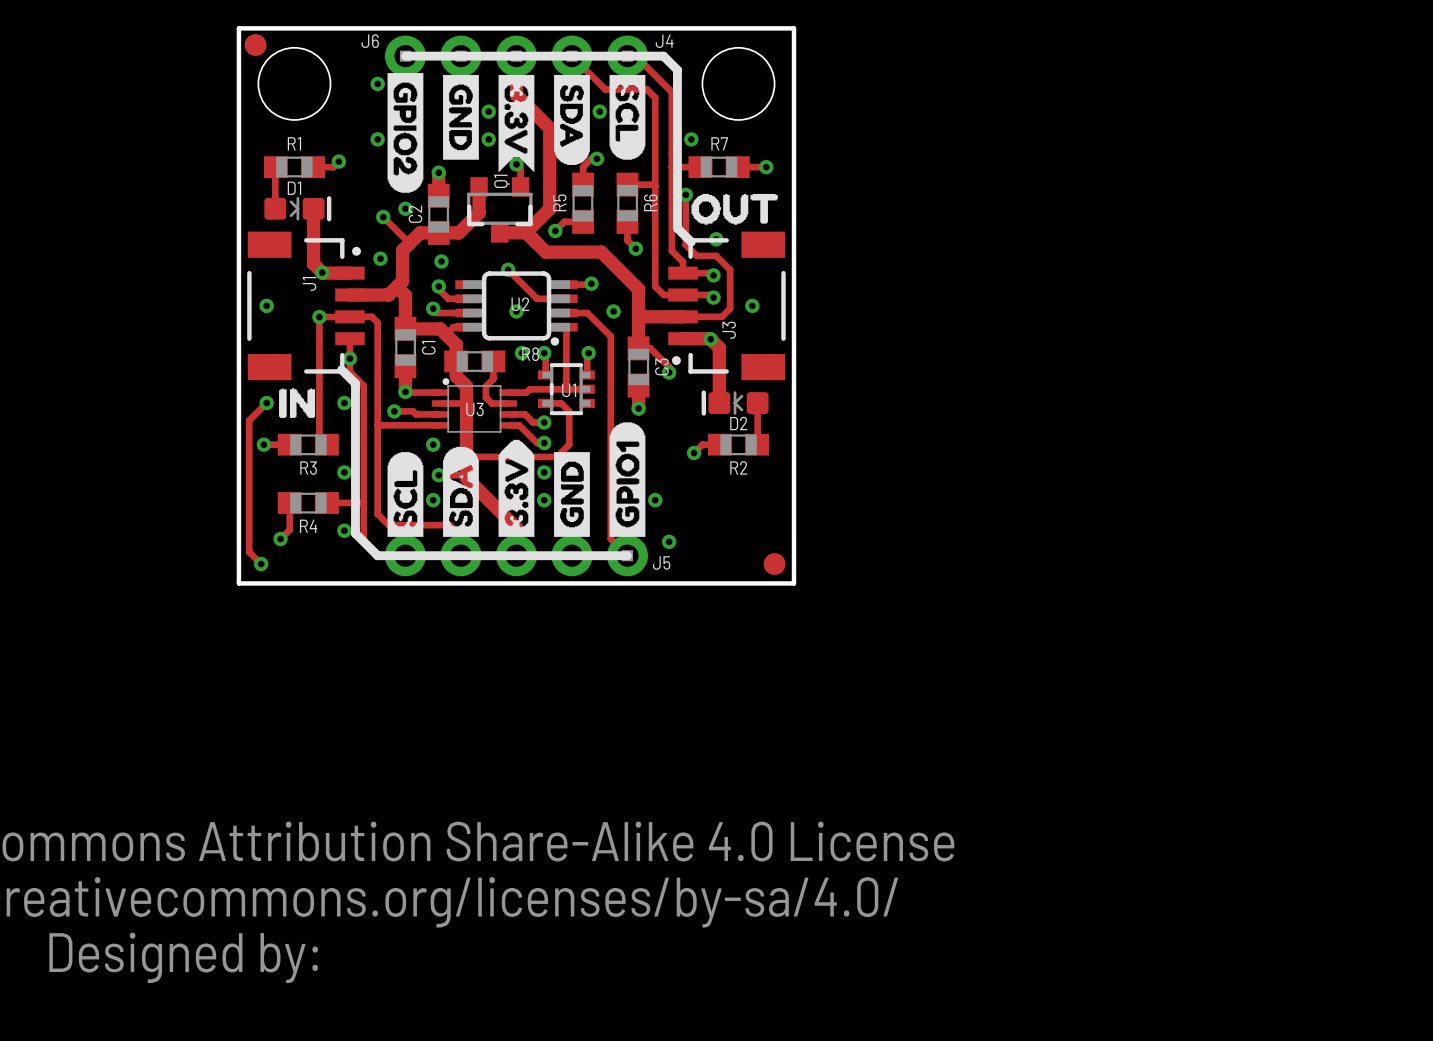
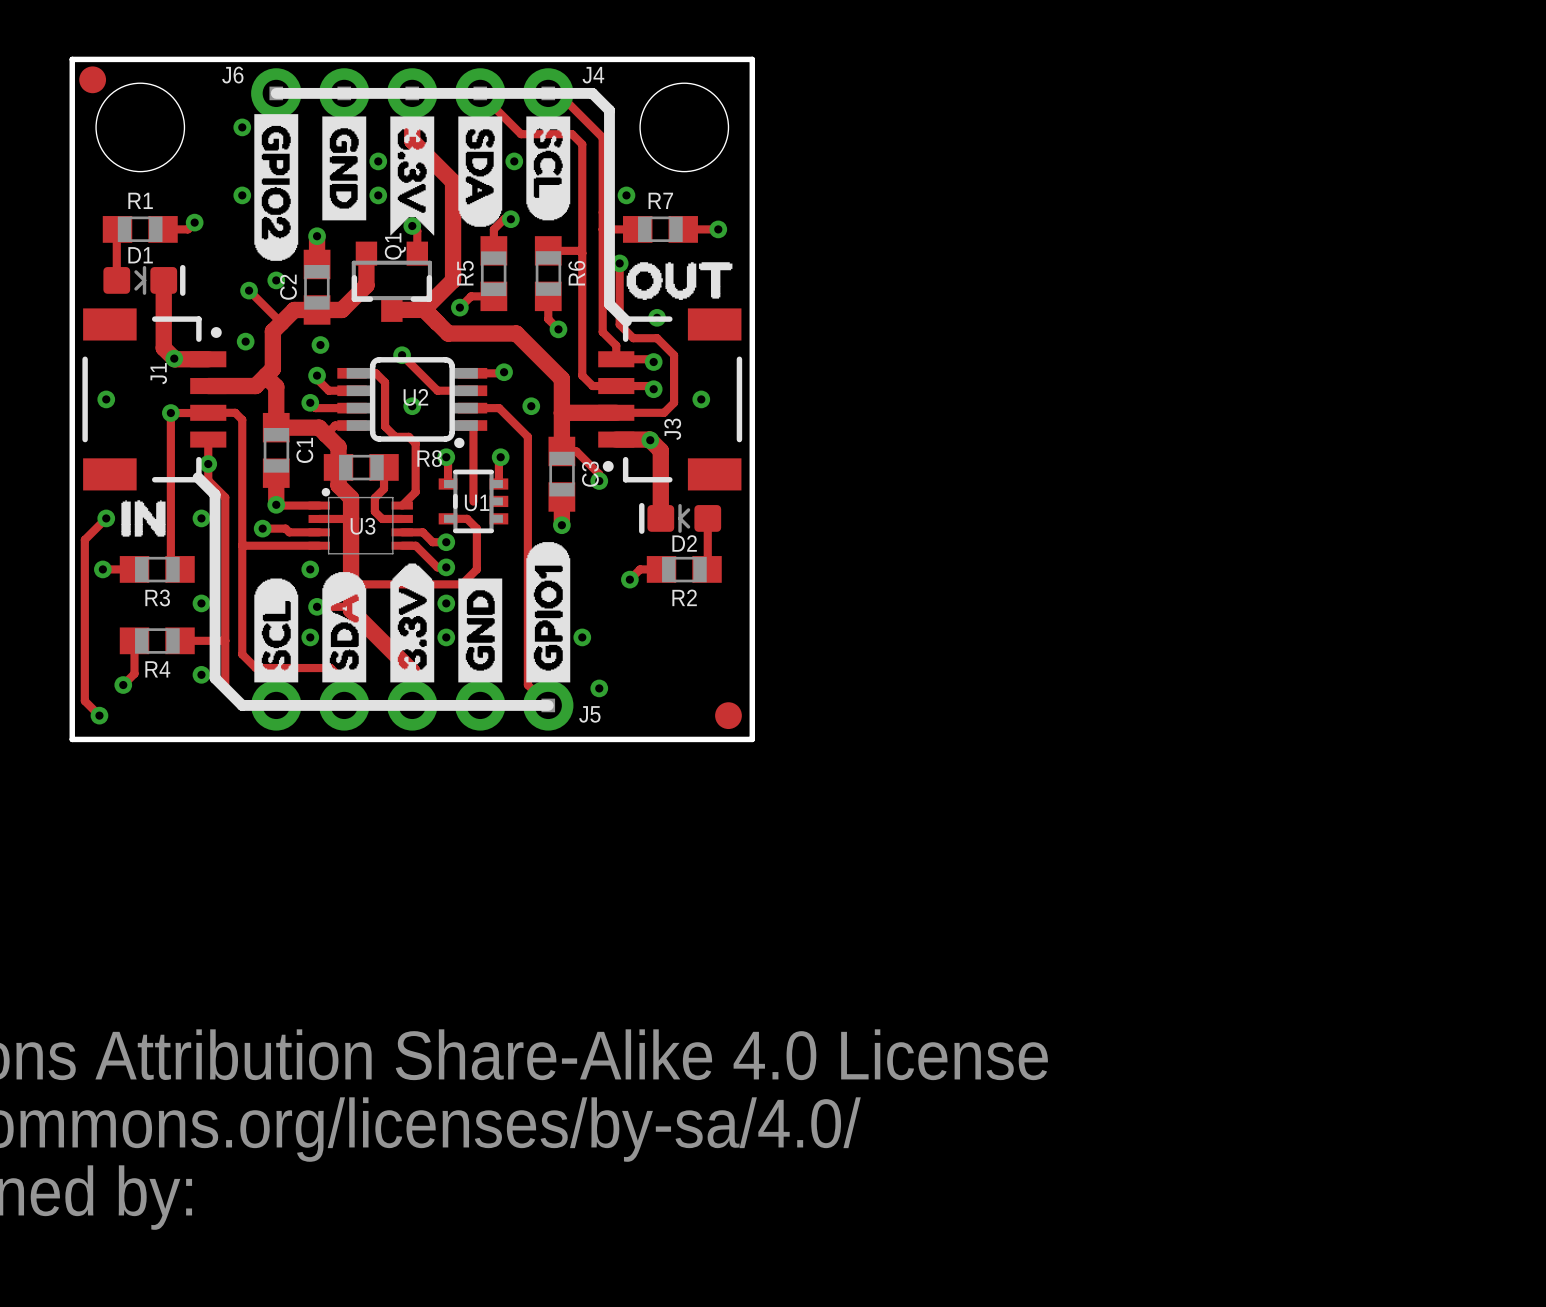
via: (522, 353) -> none
track: (587, 389) (529, 389) (526, 392) (508, 392) -> (352, 373) (375, 373) (385, 382) (385, 426) (395, 436) (408, 436) (415, 443) (415, 492) (402, 505)

